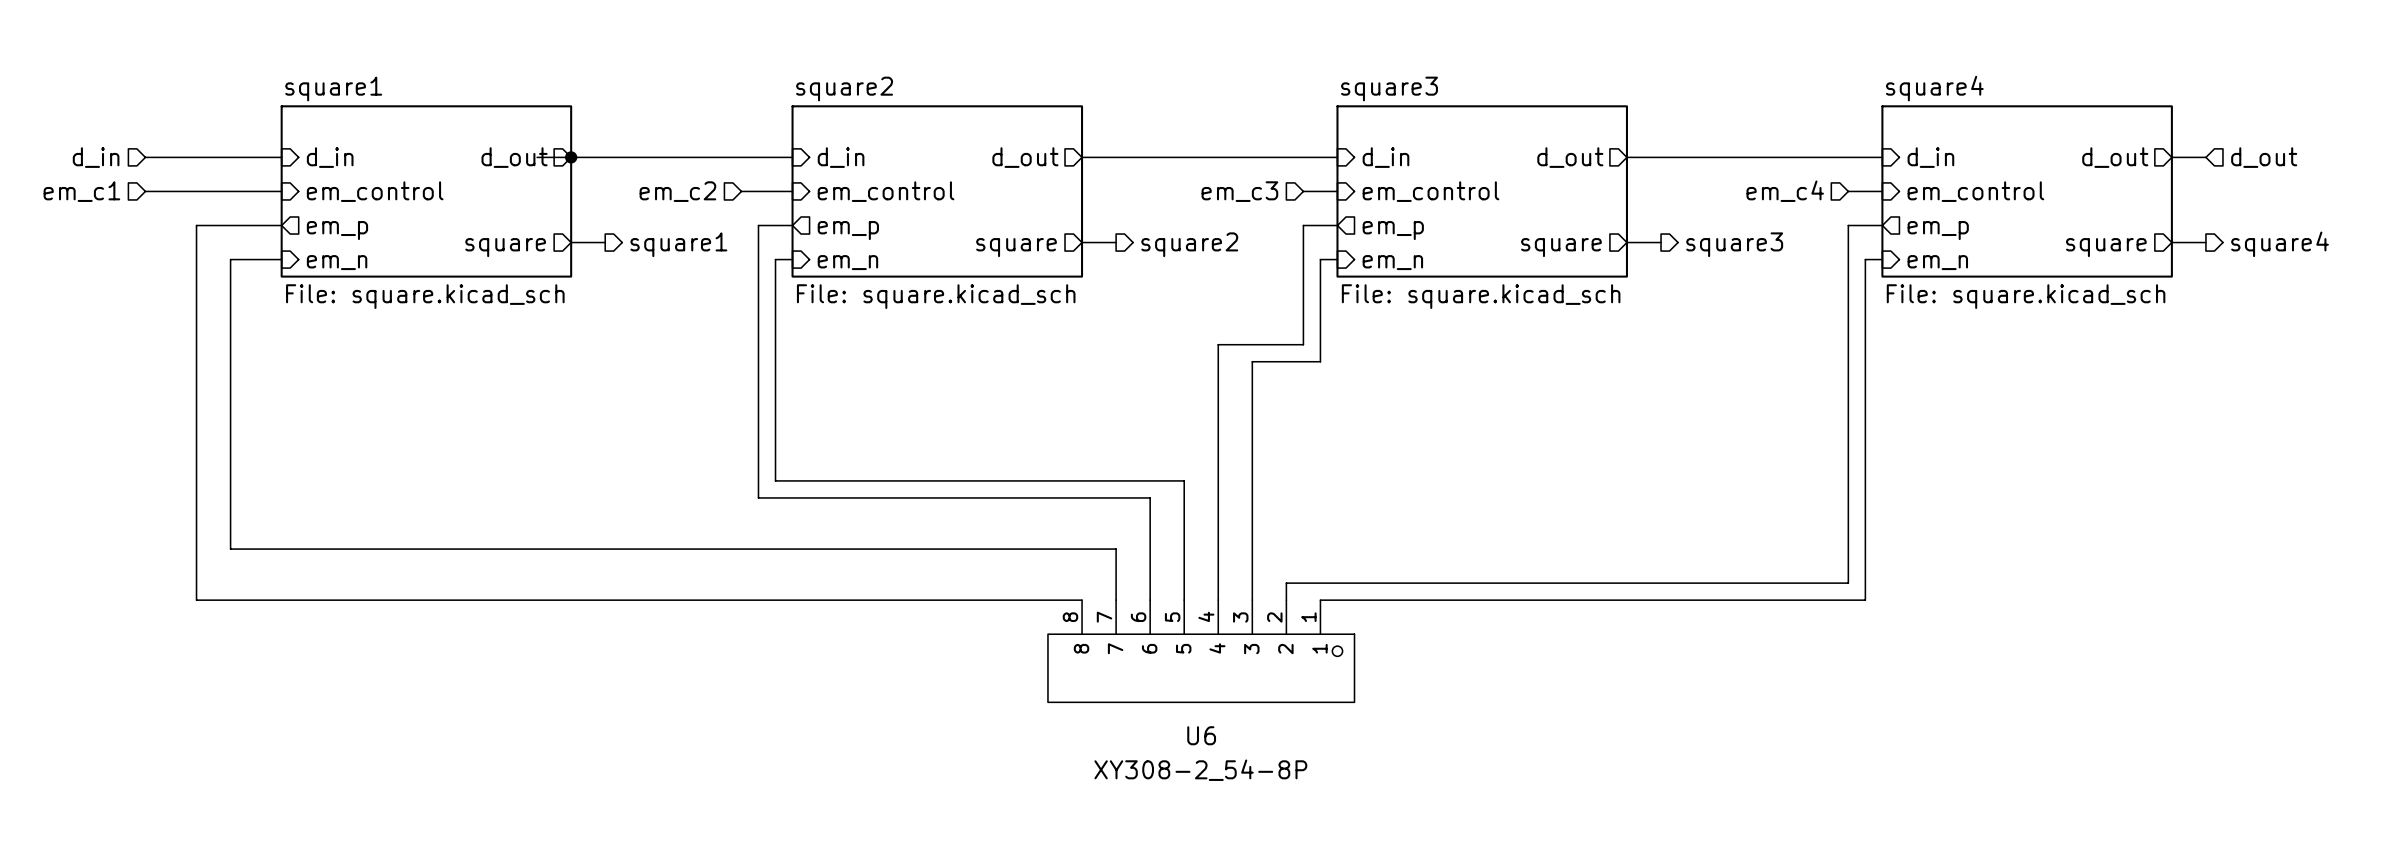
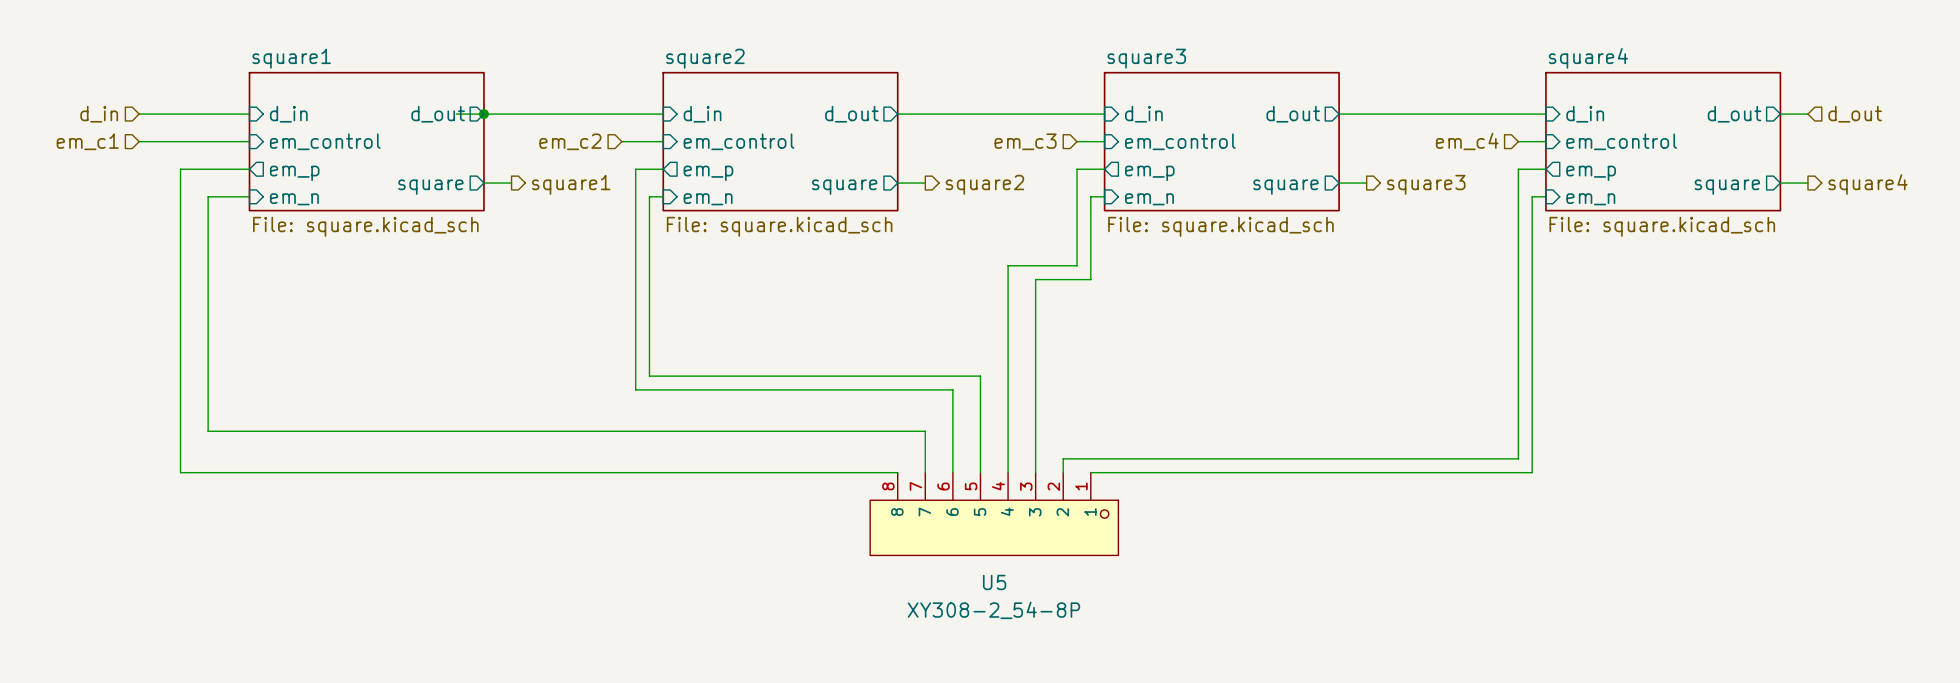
U6 name: U6 (1201, 735) -> U5 (994, 582)

